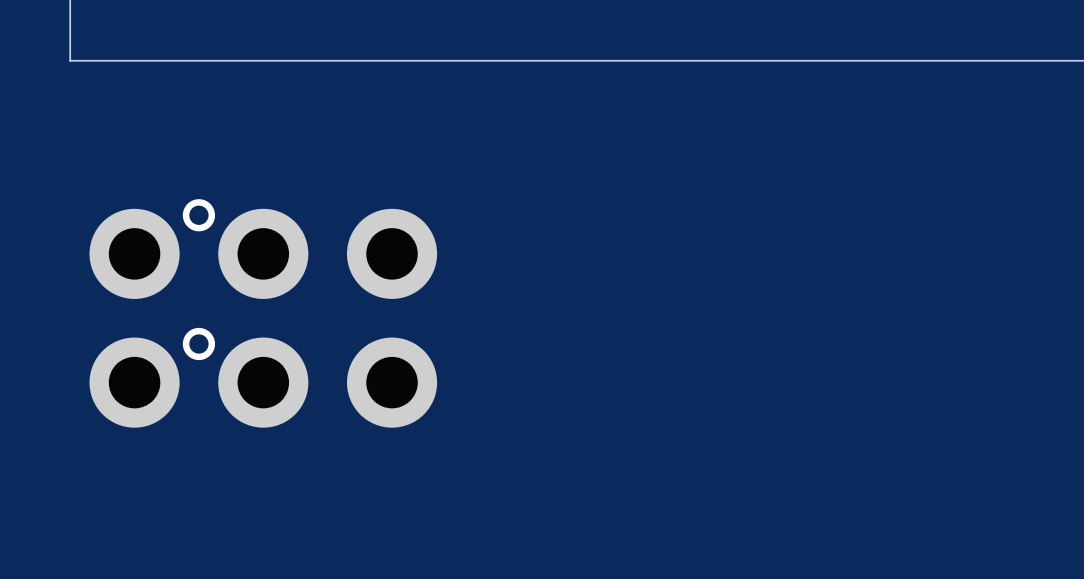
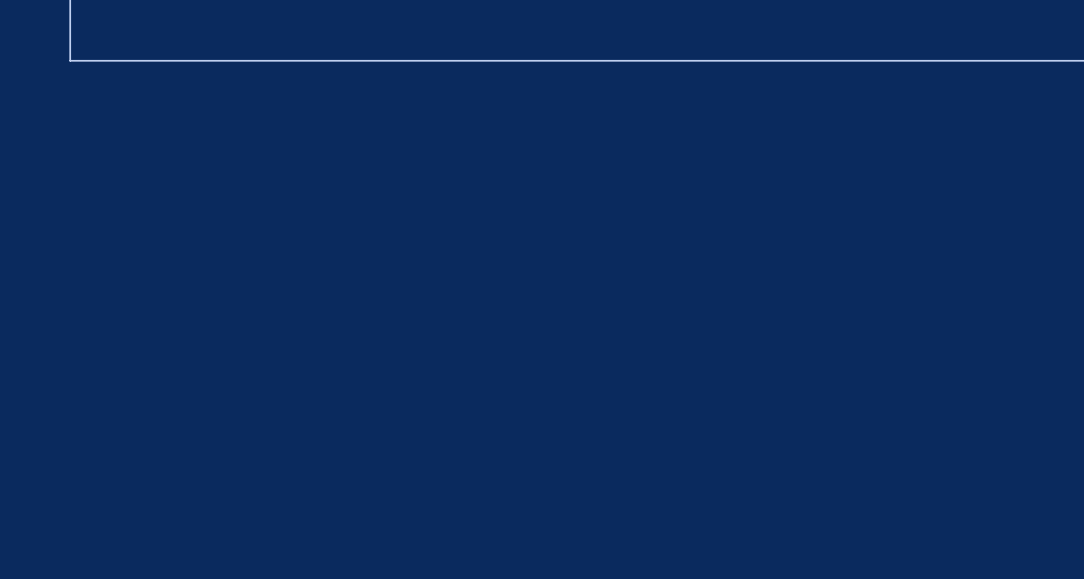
part: (263, 249) -> none
part: (263, 377) -> none

